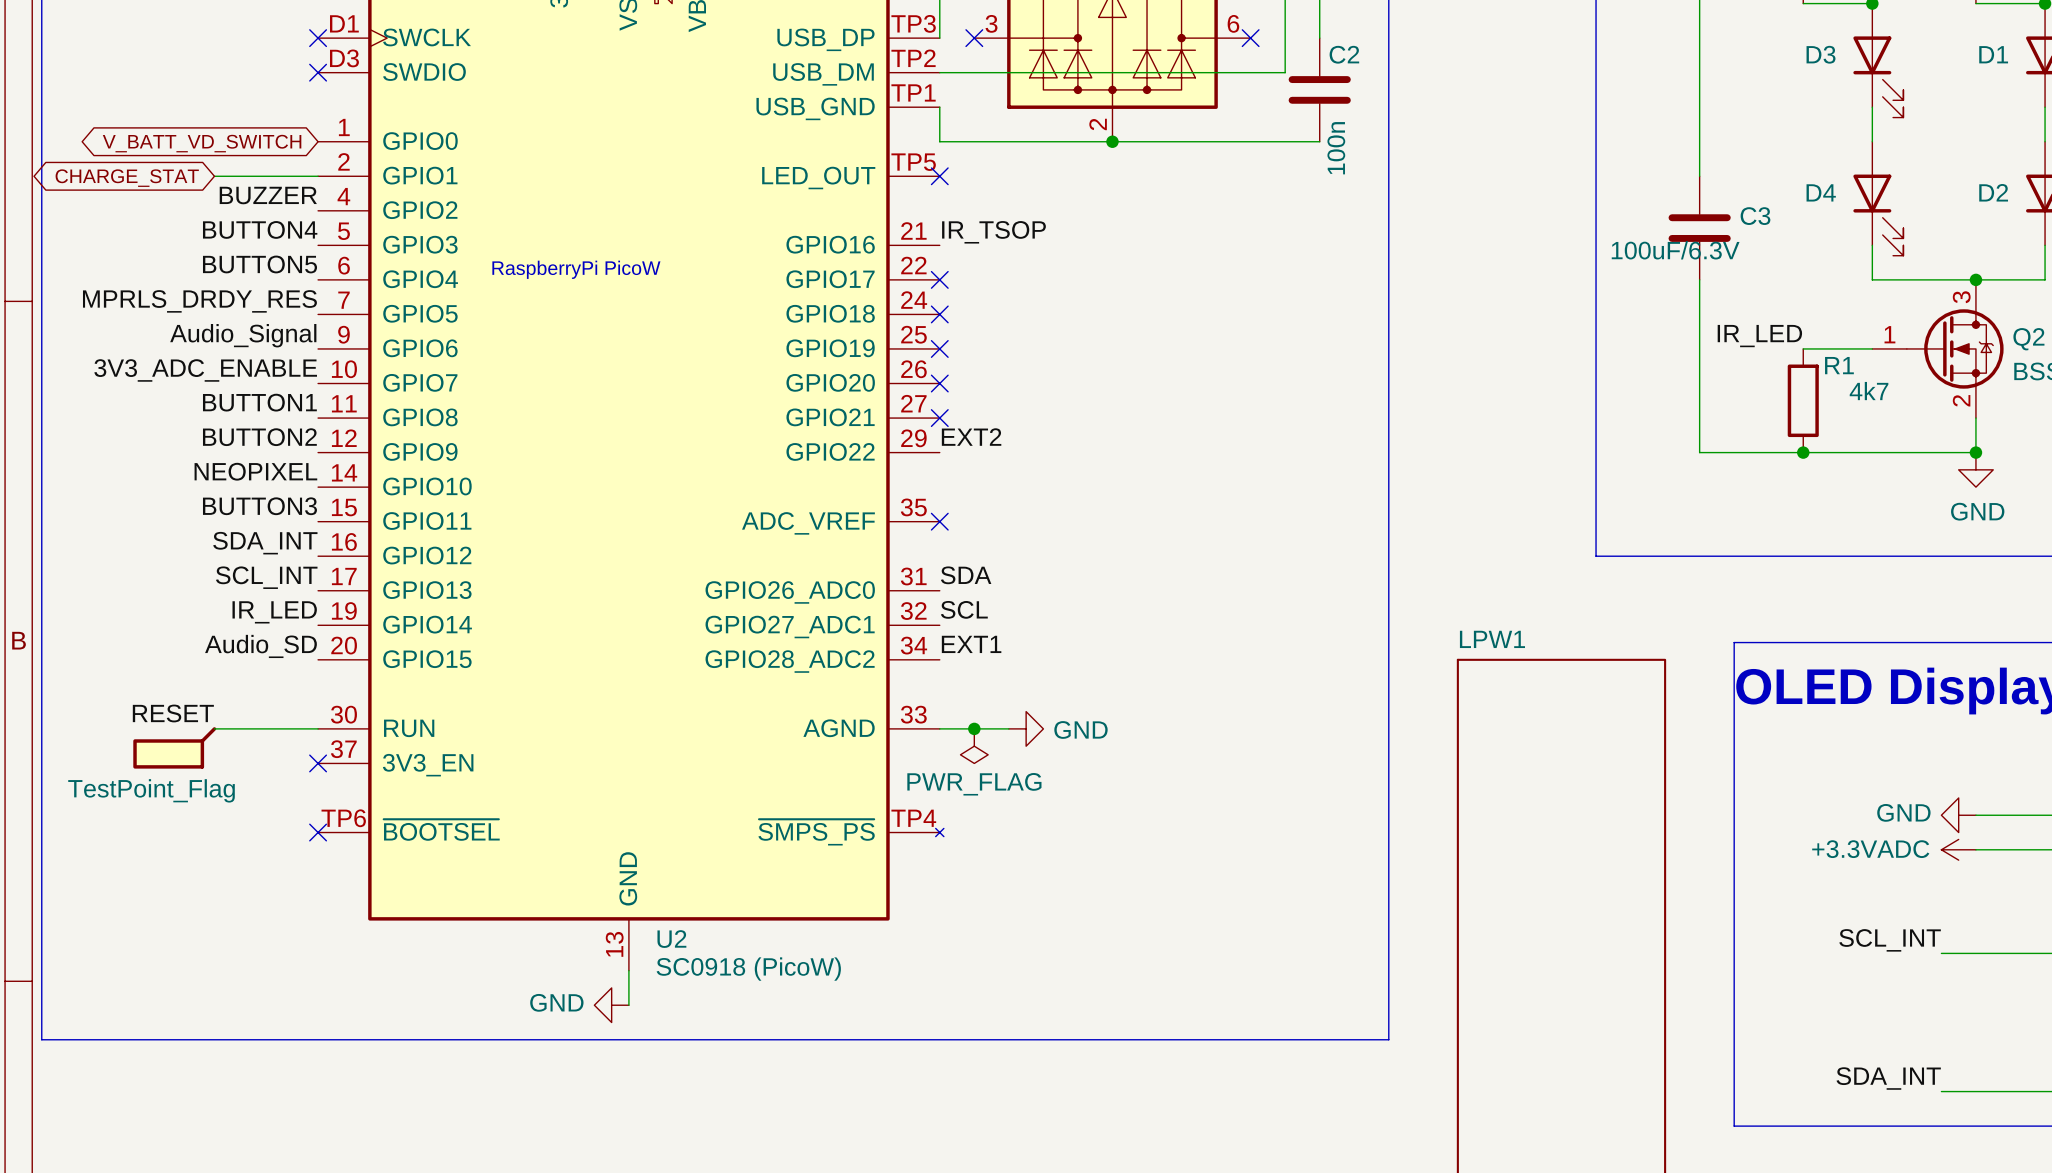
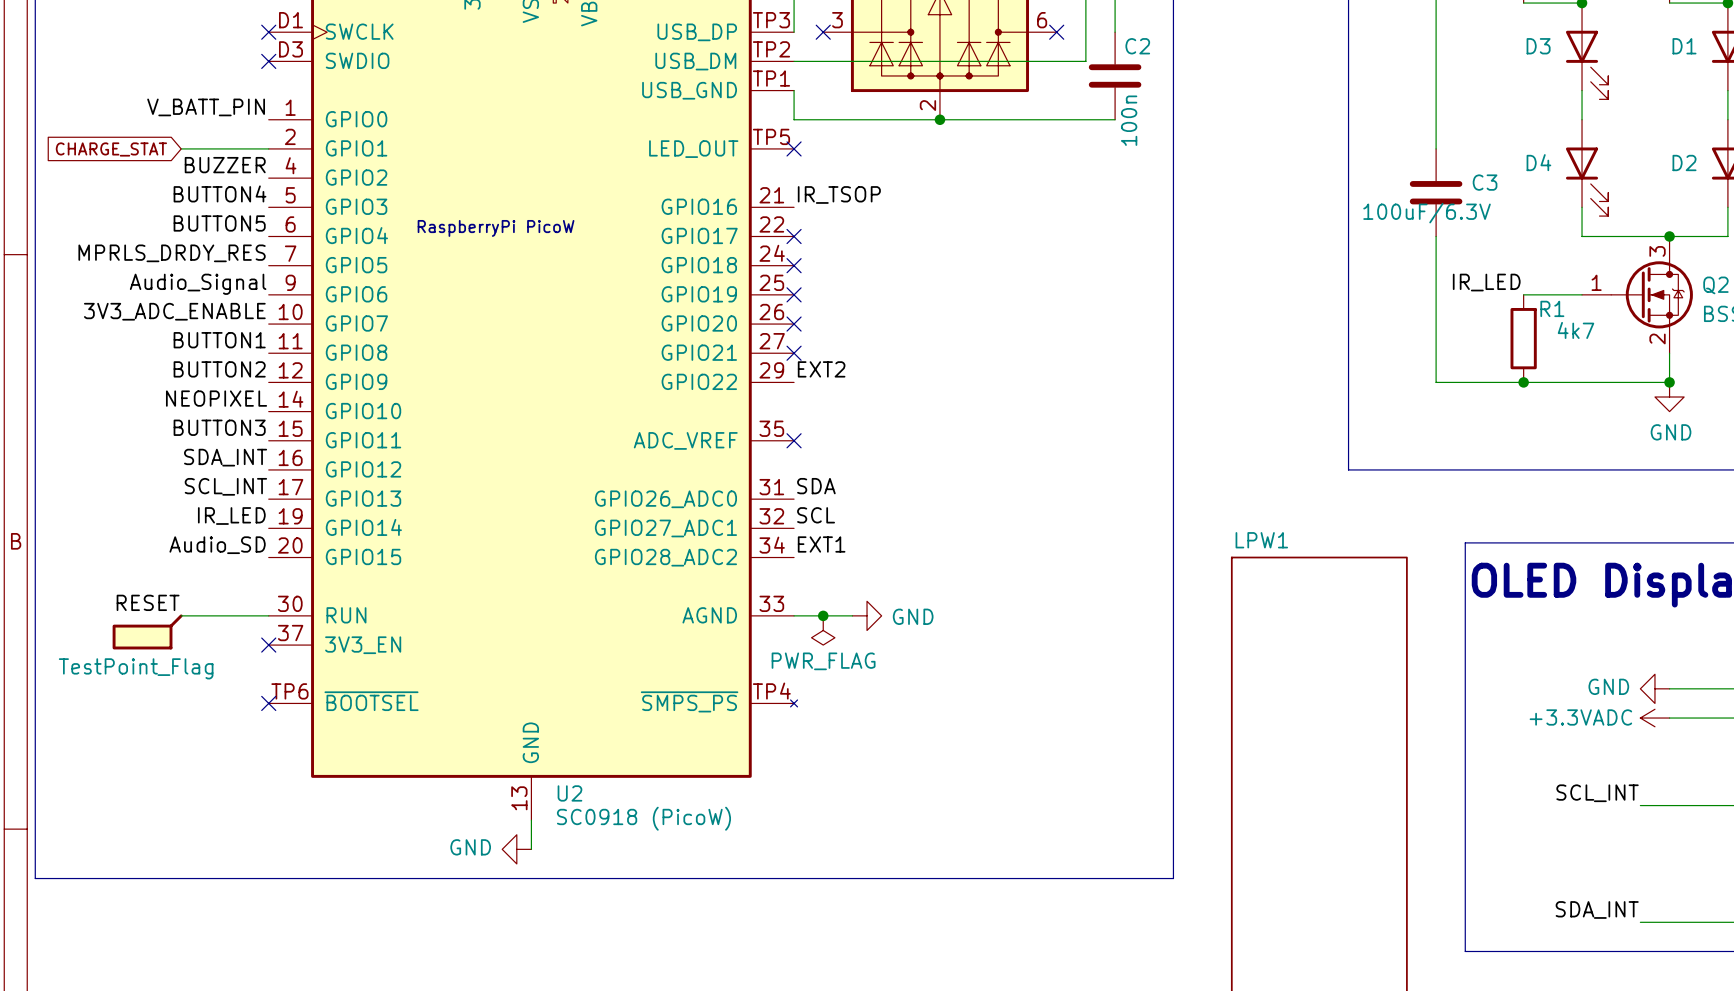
label: none -> V_BATT_PIN (206, 107)
global label: V_BATT_VD_SWITCH (202, 143) -> none
global label shape: bidirectional (127, 178) -> input (111, 149)

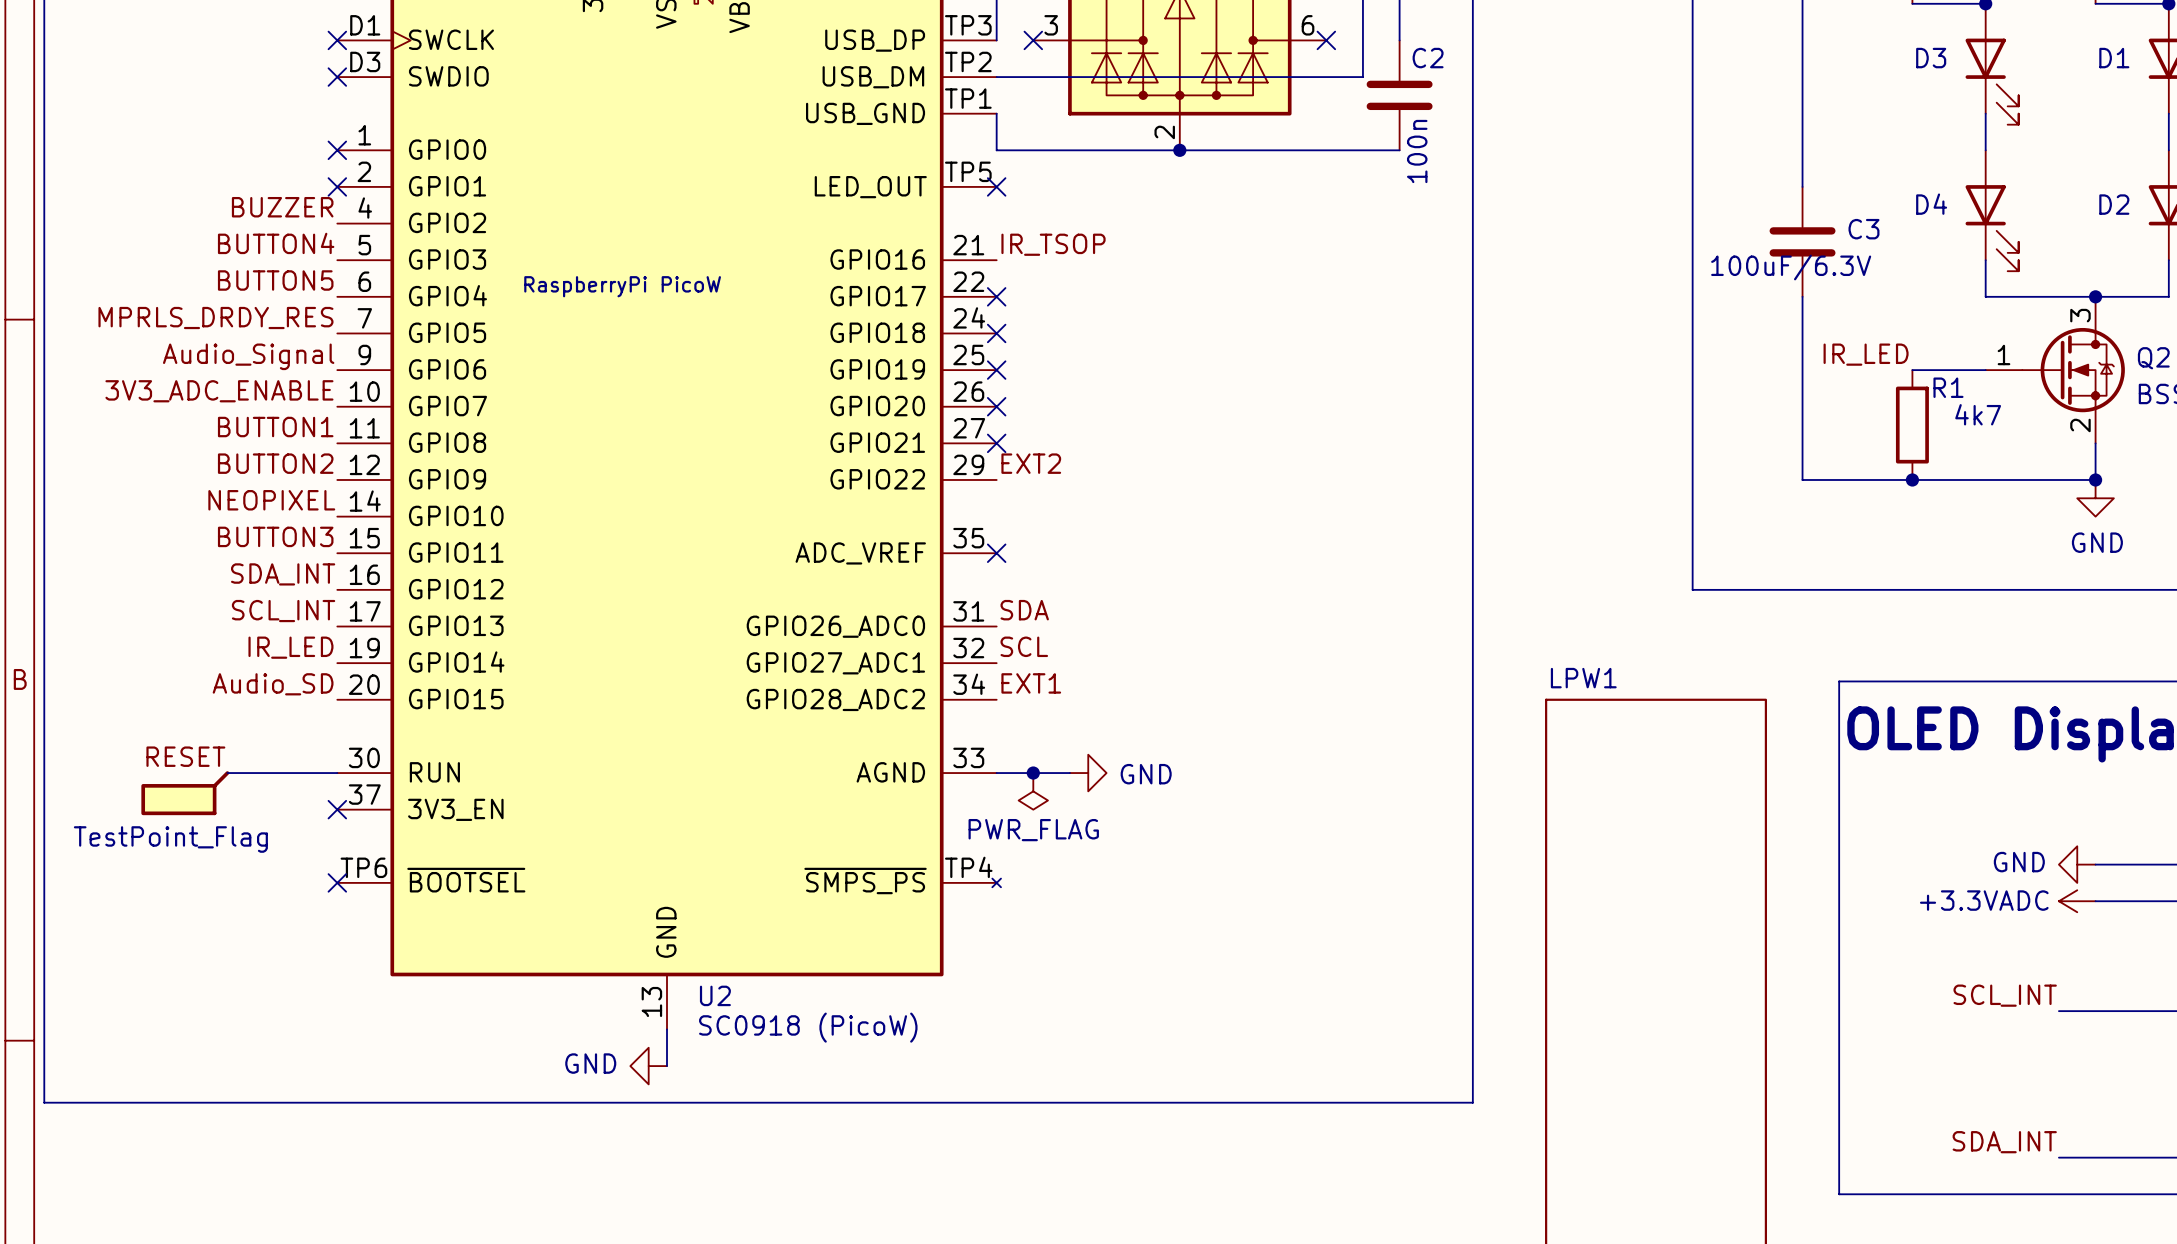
label: V_BATT_PIN (206, 107) -> none
no-connect mark: none -> (337, 150)
wire: (181, 148) (268, 148) -> none
no-connect mark: none -> (337, 186)
global label: CHARGE_STAT (111, 149) -> none

